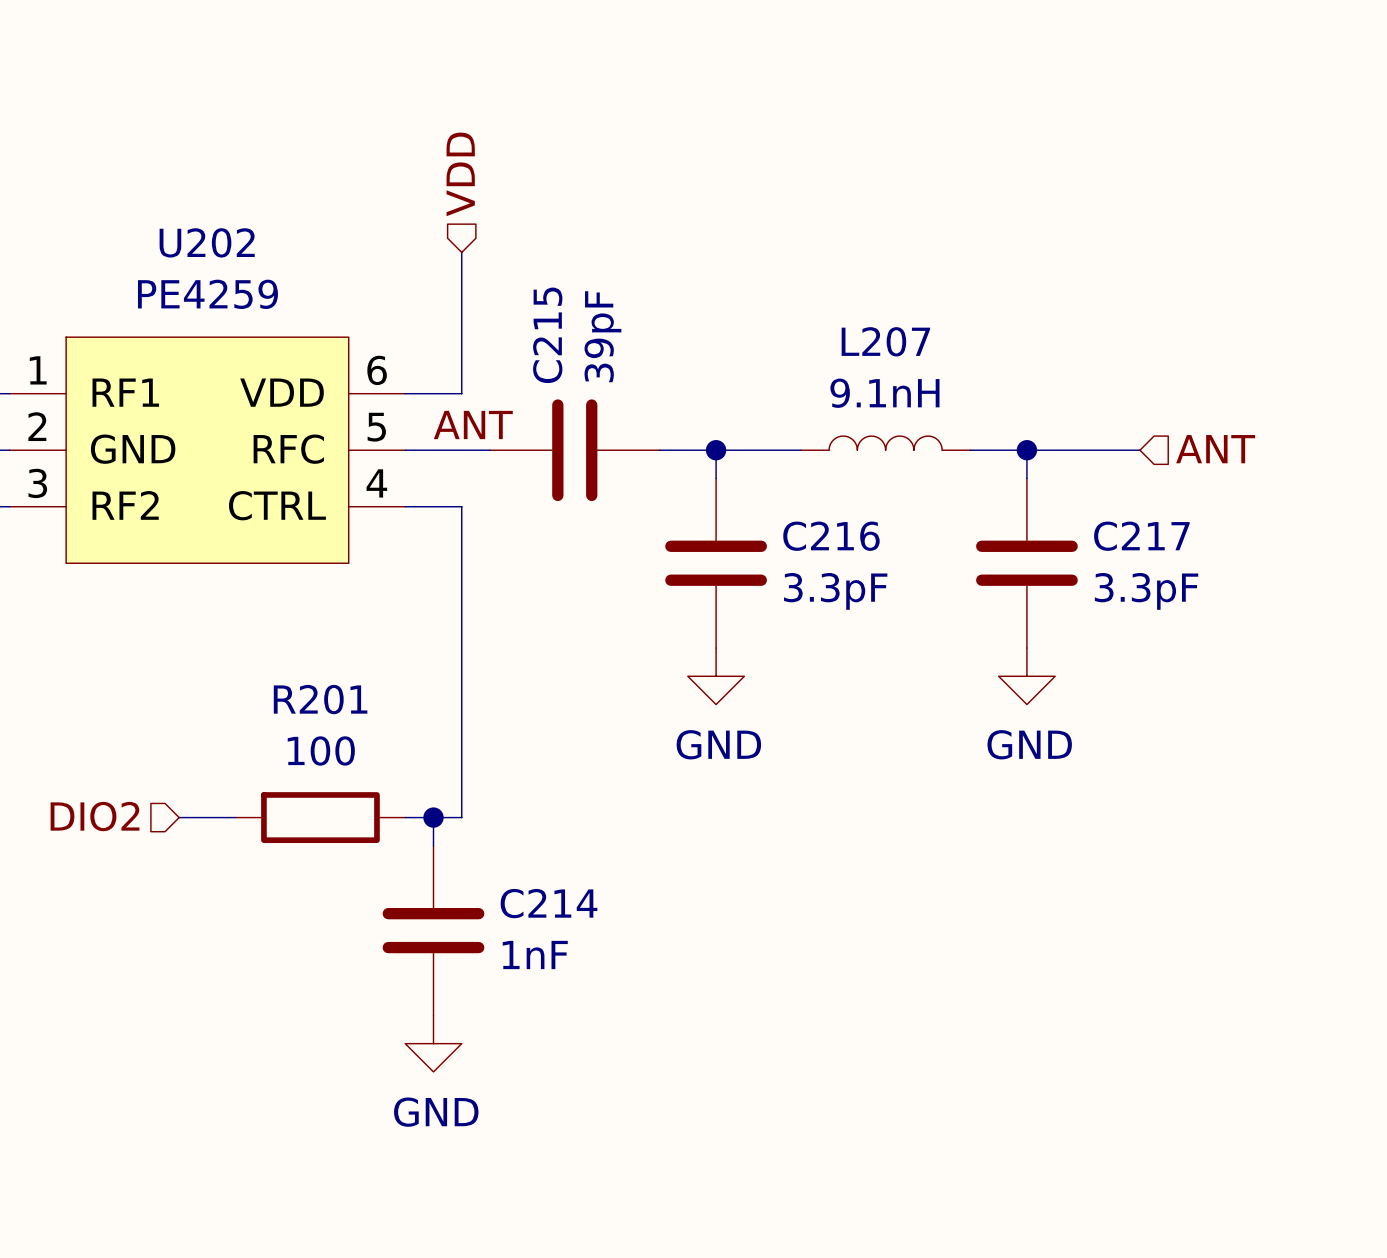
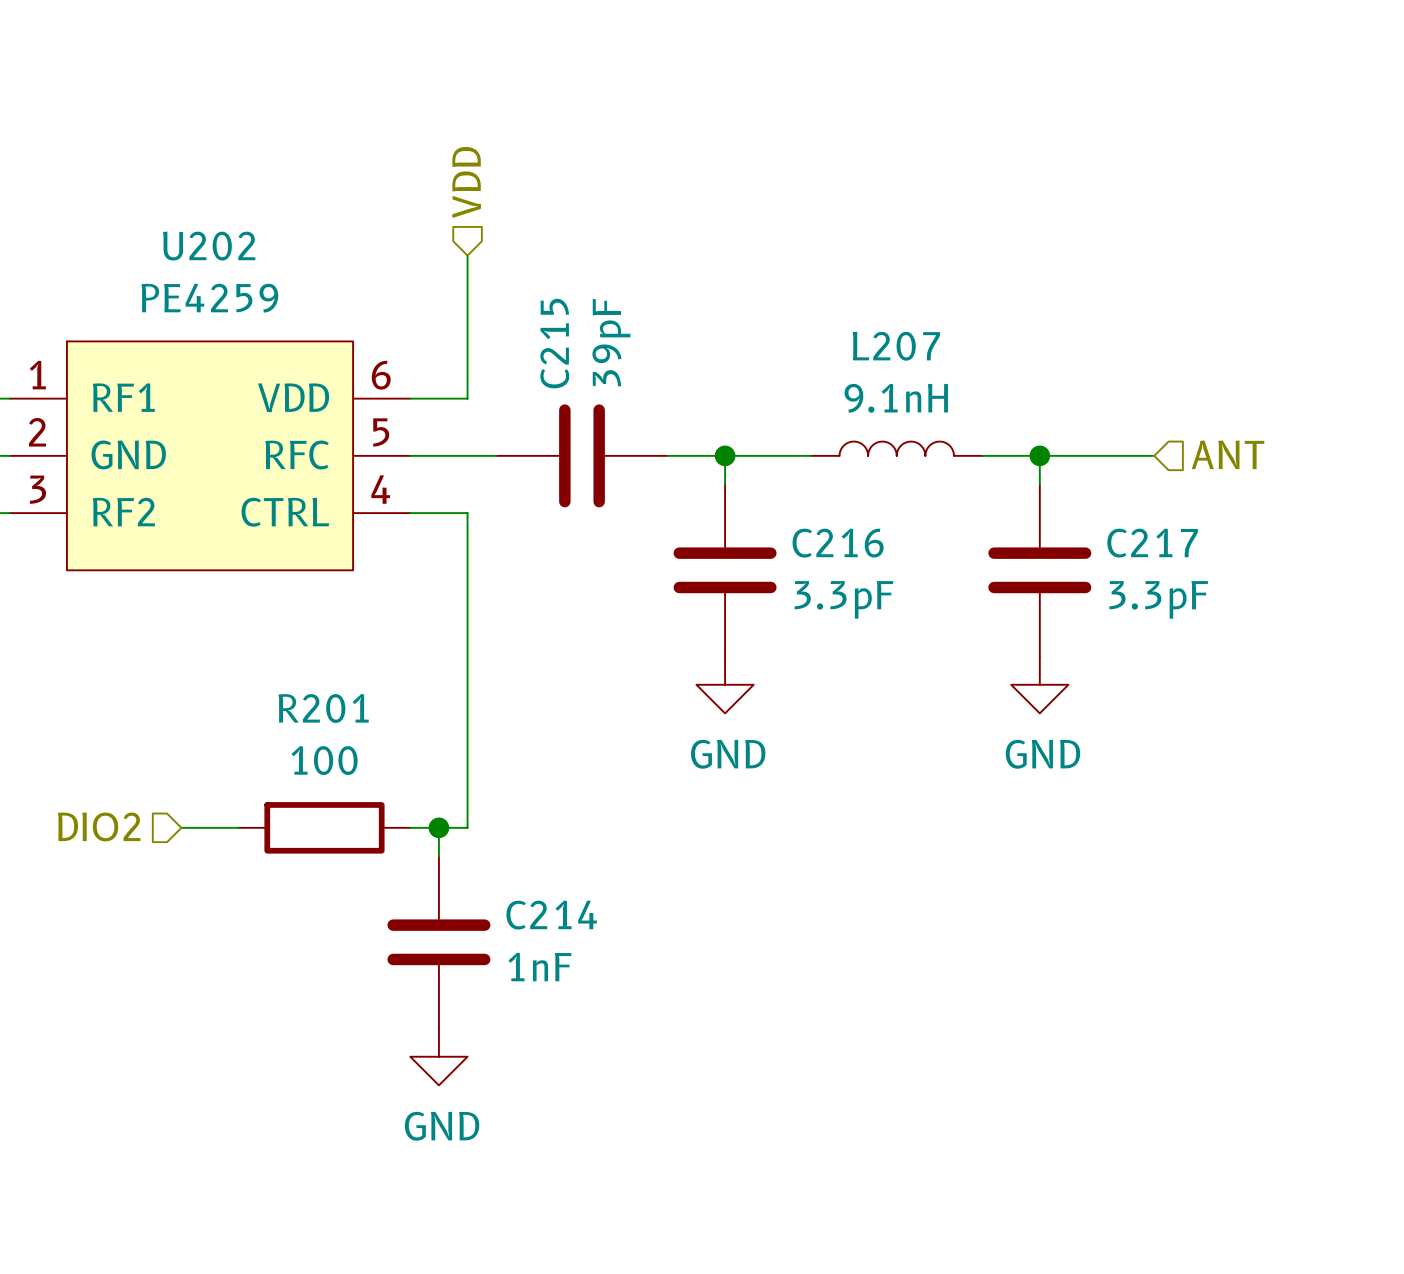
label: ANT (473, 424) -> none

